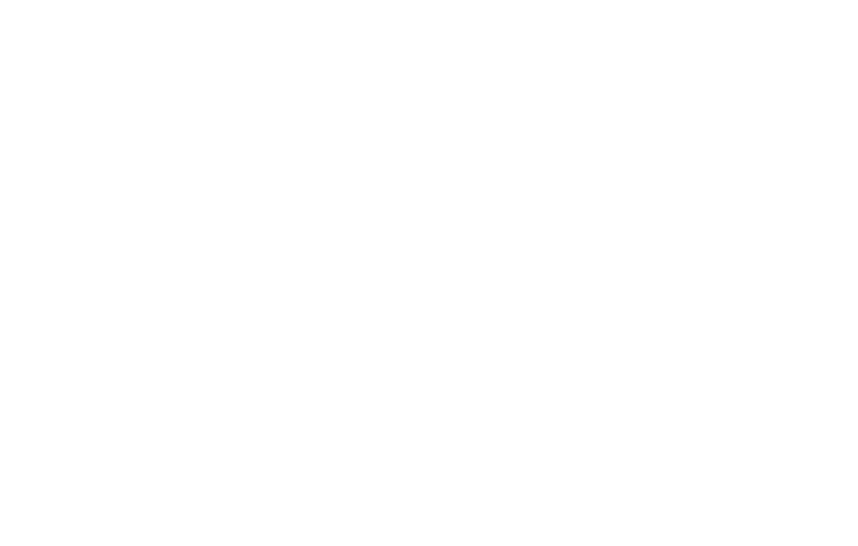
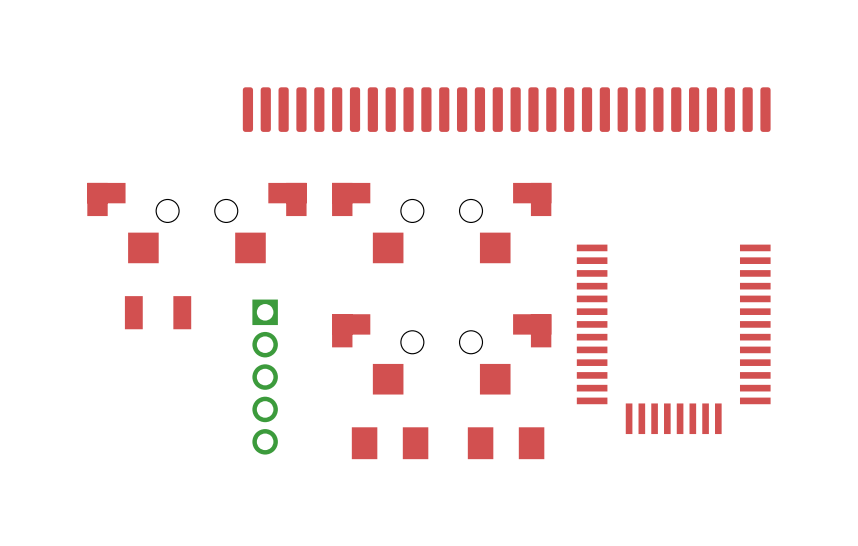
part: none -> (506, 109)
part: none -> (196, 223)
part: none -> (441, 223)
part: none -> (158, 312)
part: none -> (673, 339)
part: none -> (441, 354)
part: none -> (265, 377)
part: none -> (390, 443)
part: none -> (506, 443)

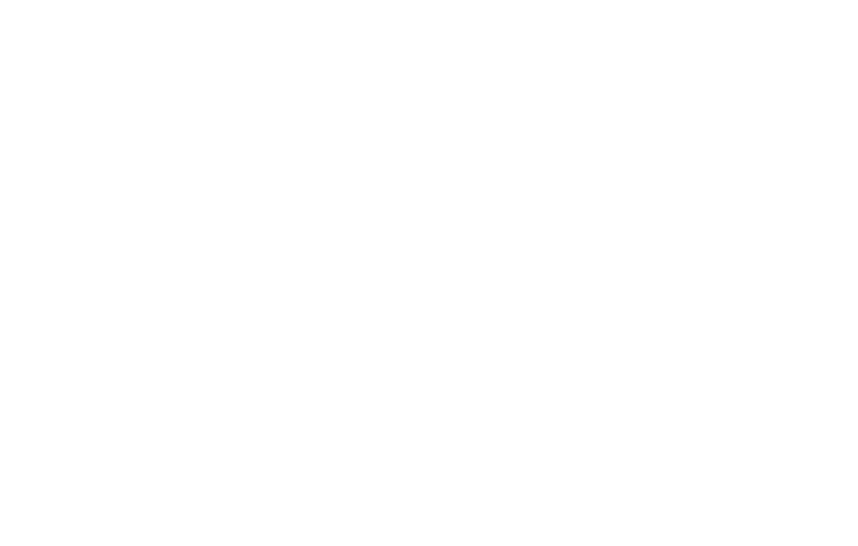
part: (506, 109) -> none
part: (196, 223) -> none
part: (441, 223) -> none
part: (158, 312) -> none
part: (673, 339) -> none
part: (441, 354) -> none
part: (265, 377) -> none
part: (390, 443) -> none
part: (506, 443) -> none

